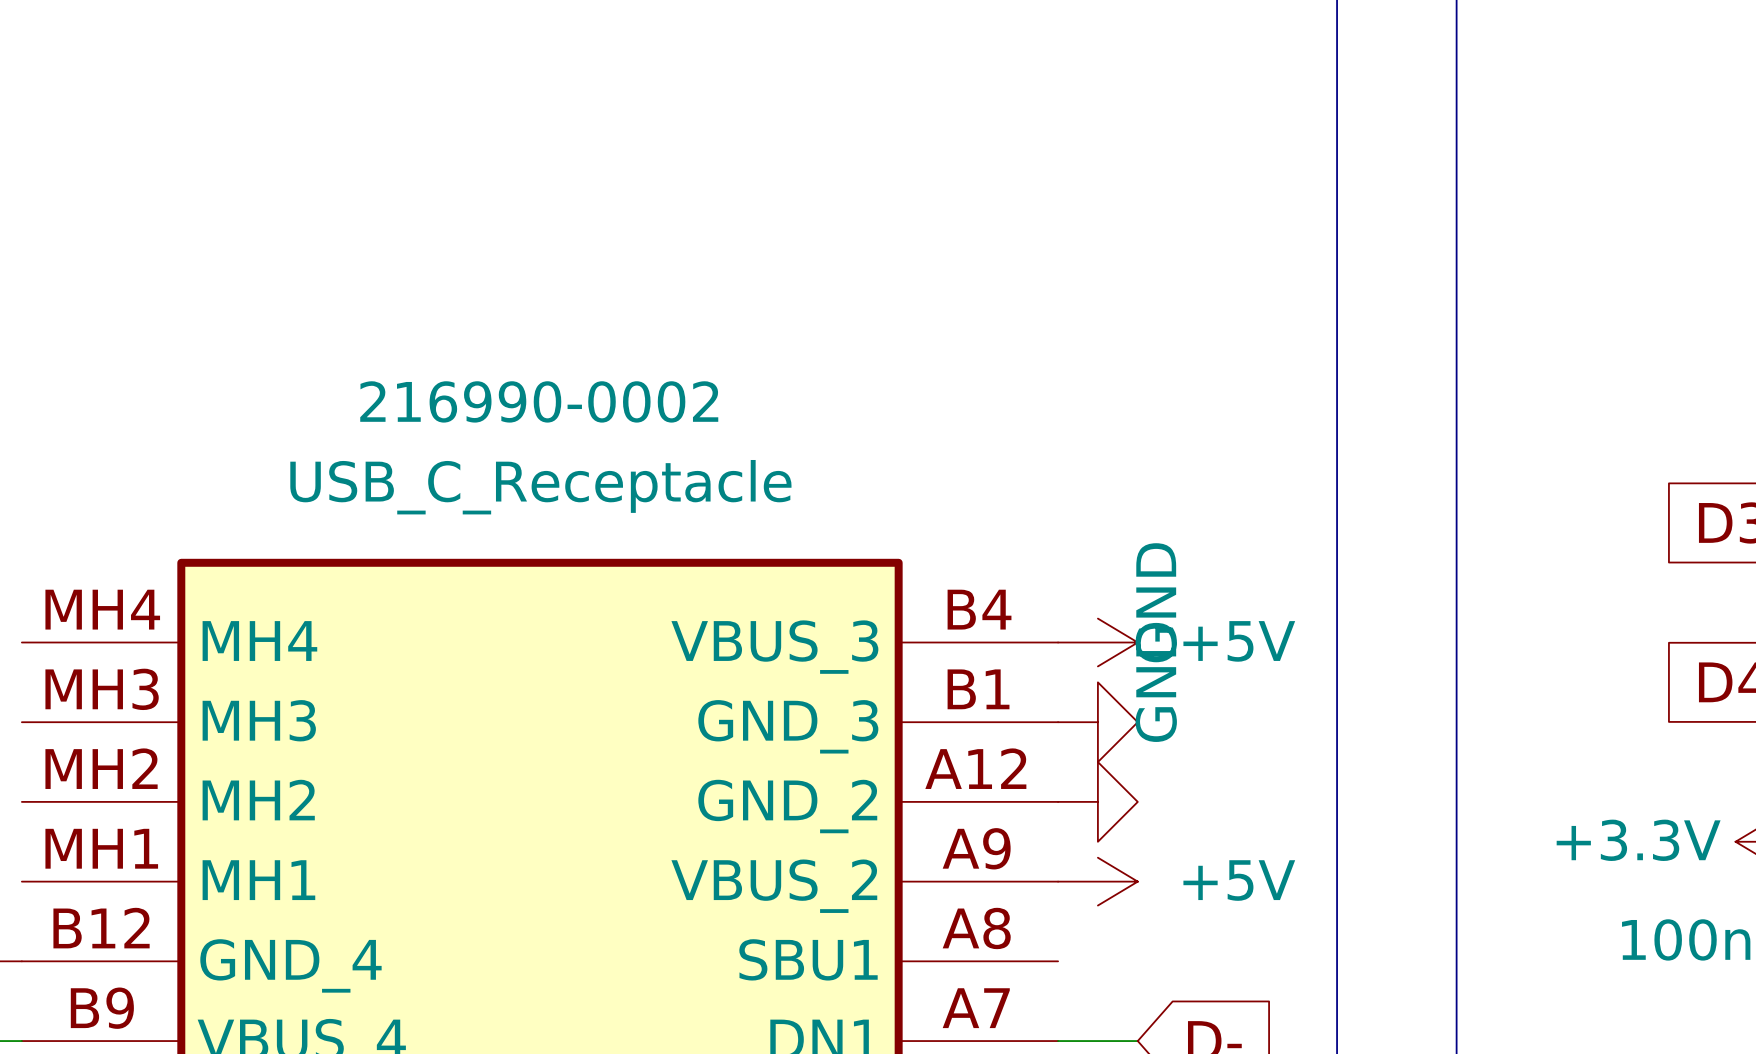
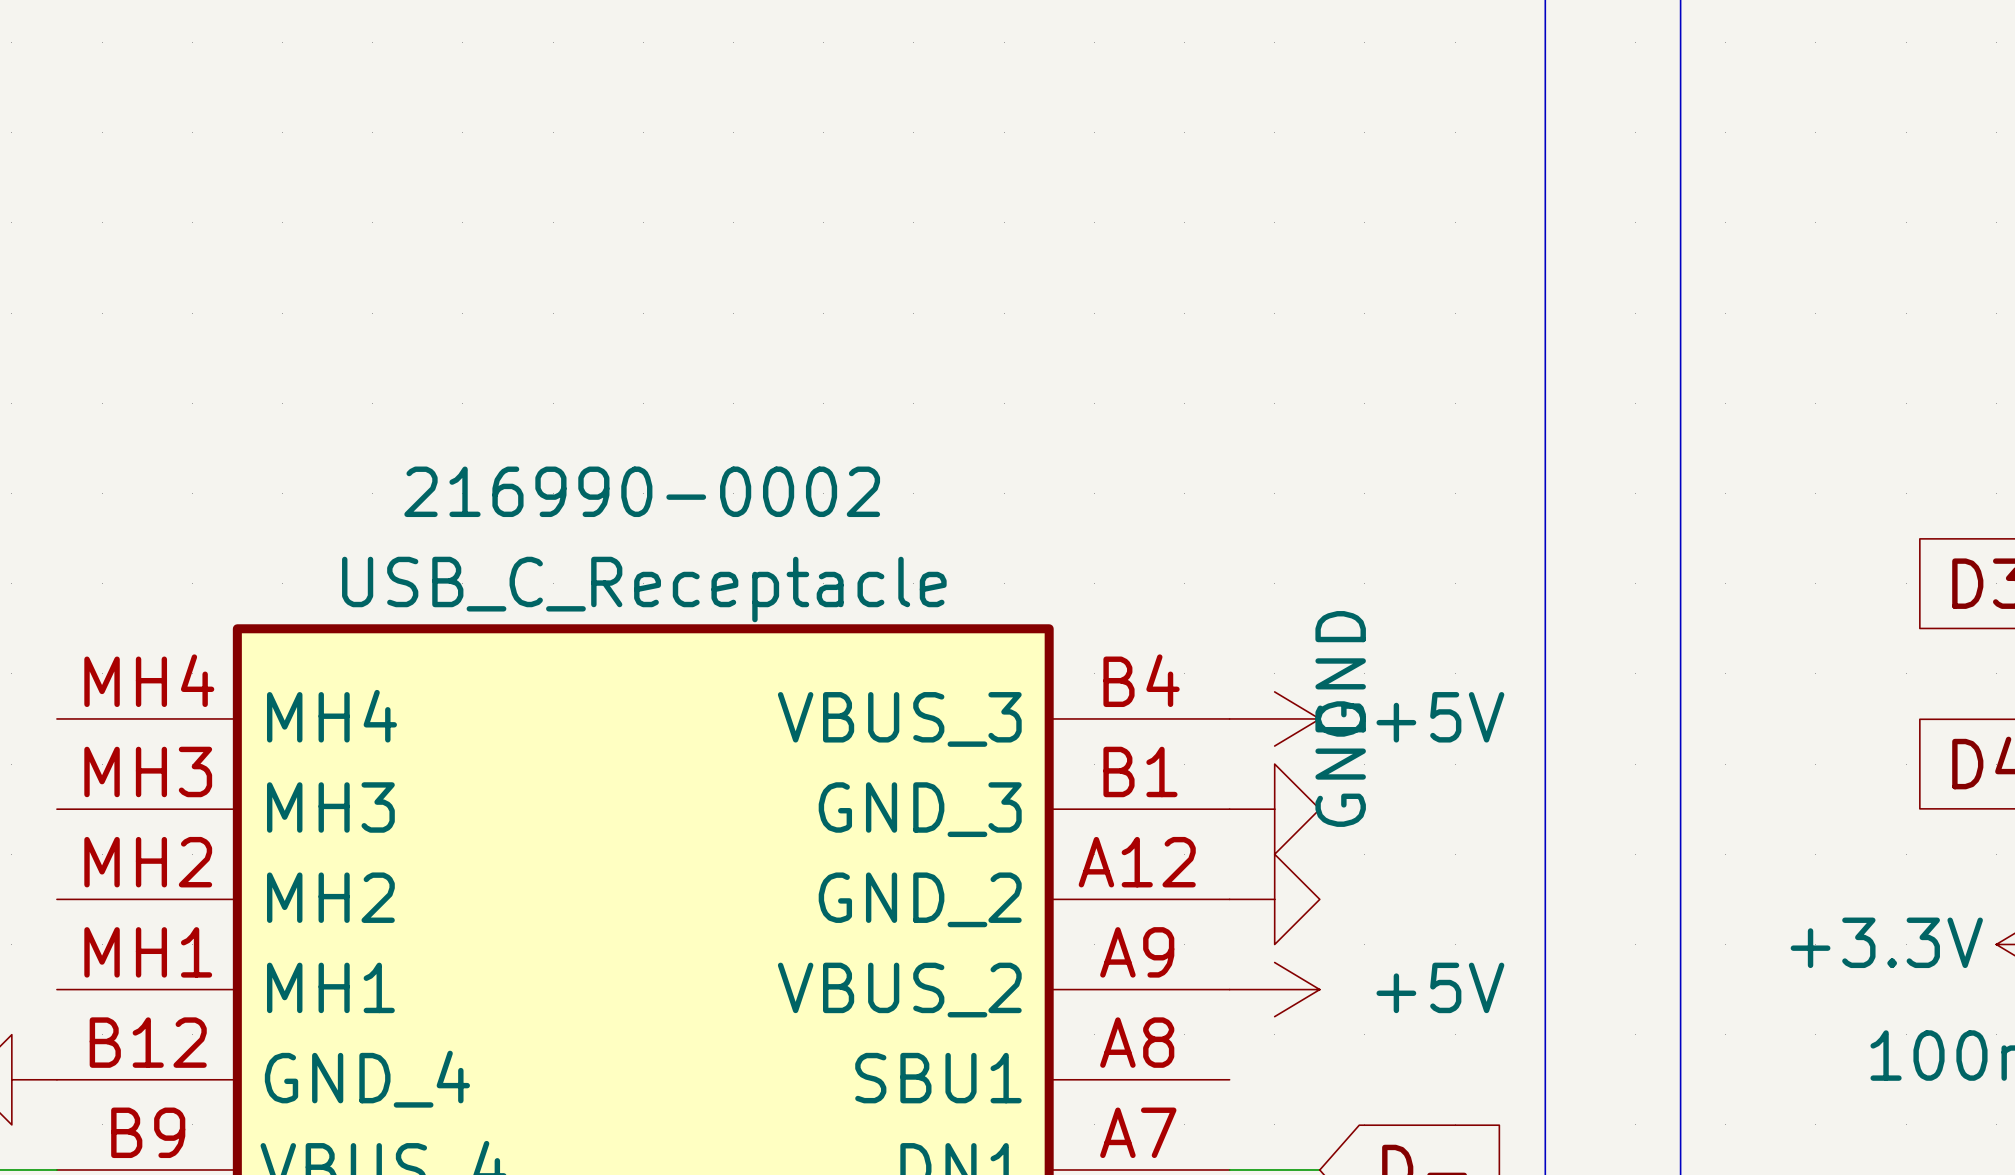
216990-0002 name position: 216990-0002 (539, 401) -> 216990-0002 (642, 491)
216990-0002 value position: USB_C_Receptacle (540, 487) -> USB_C_Receptacle (644, 589)

